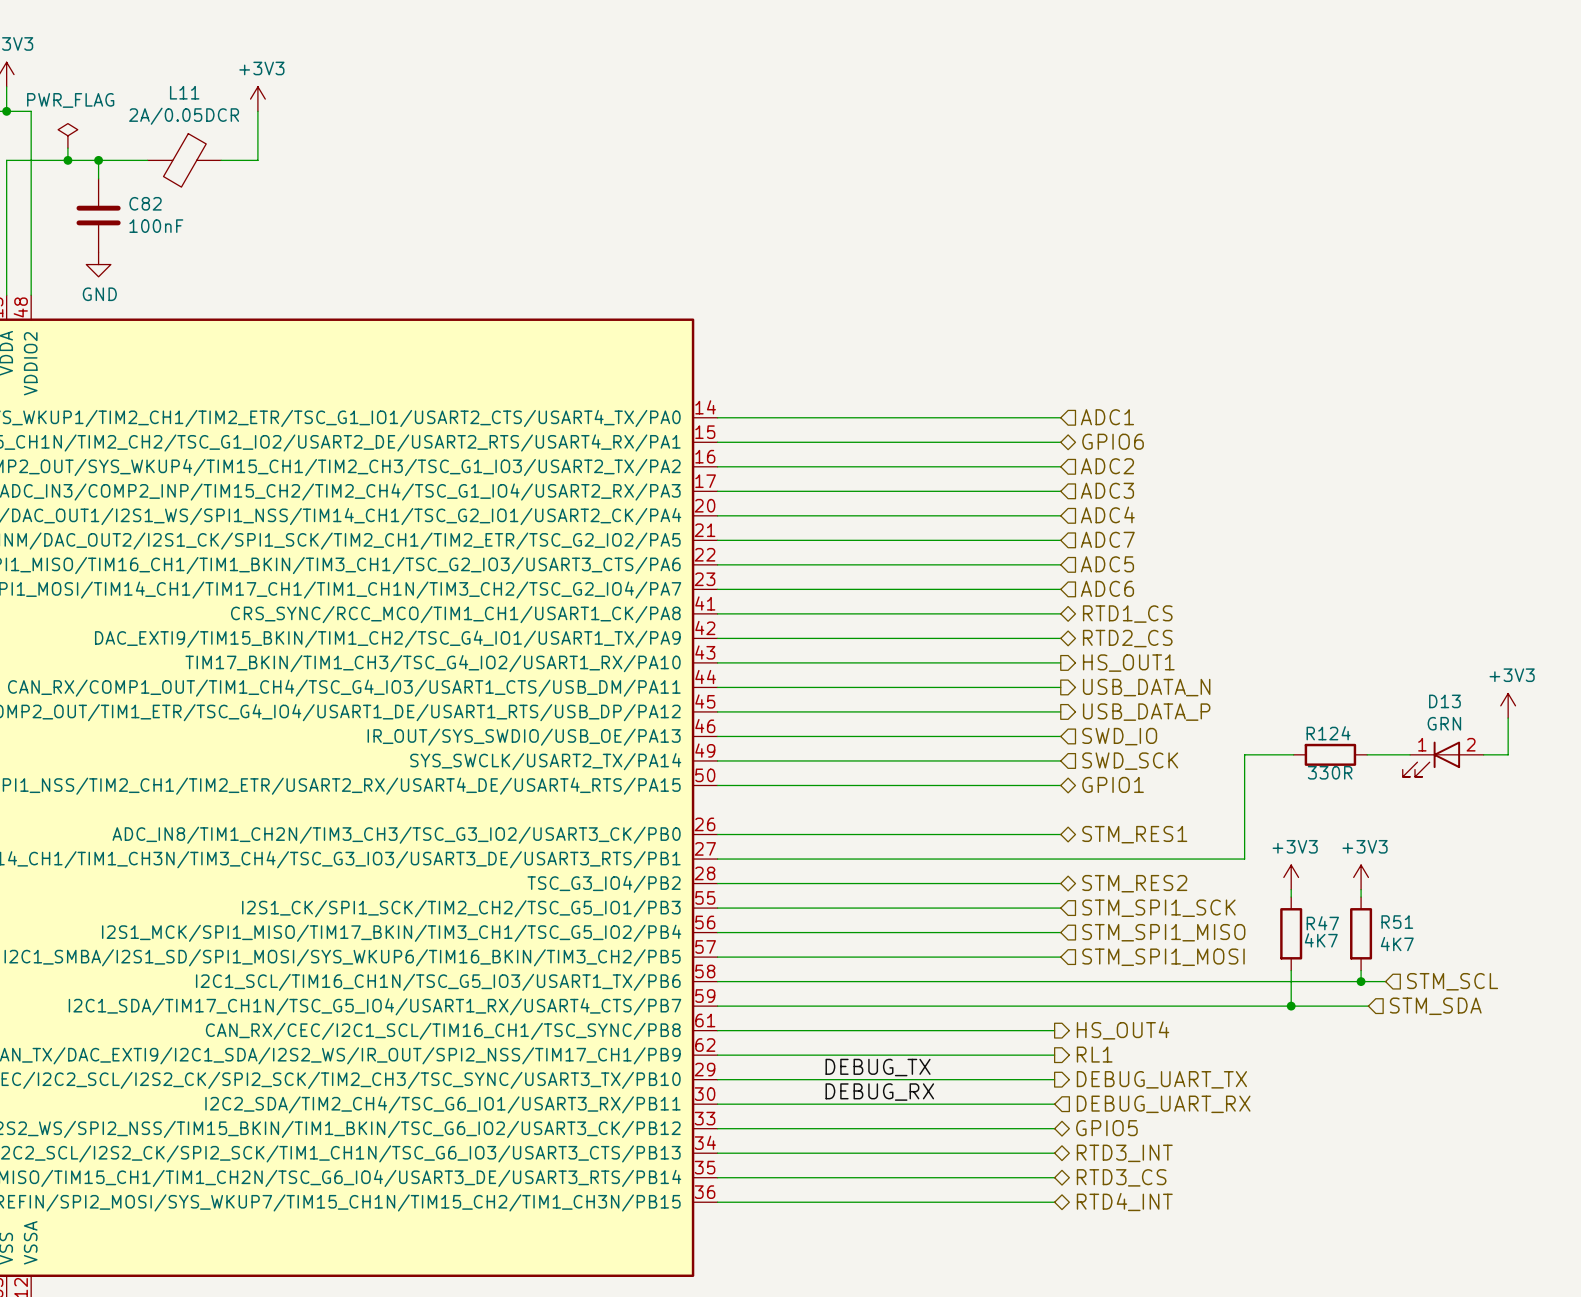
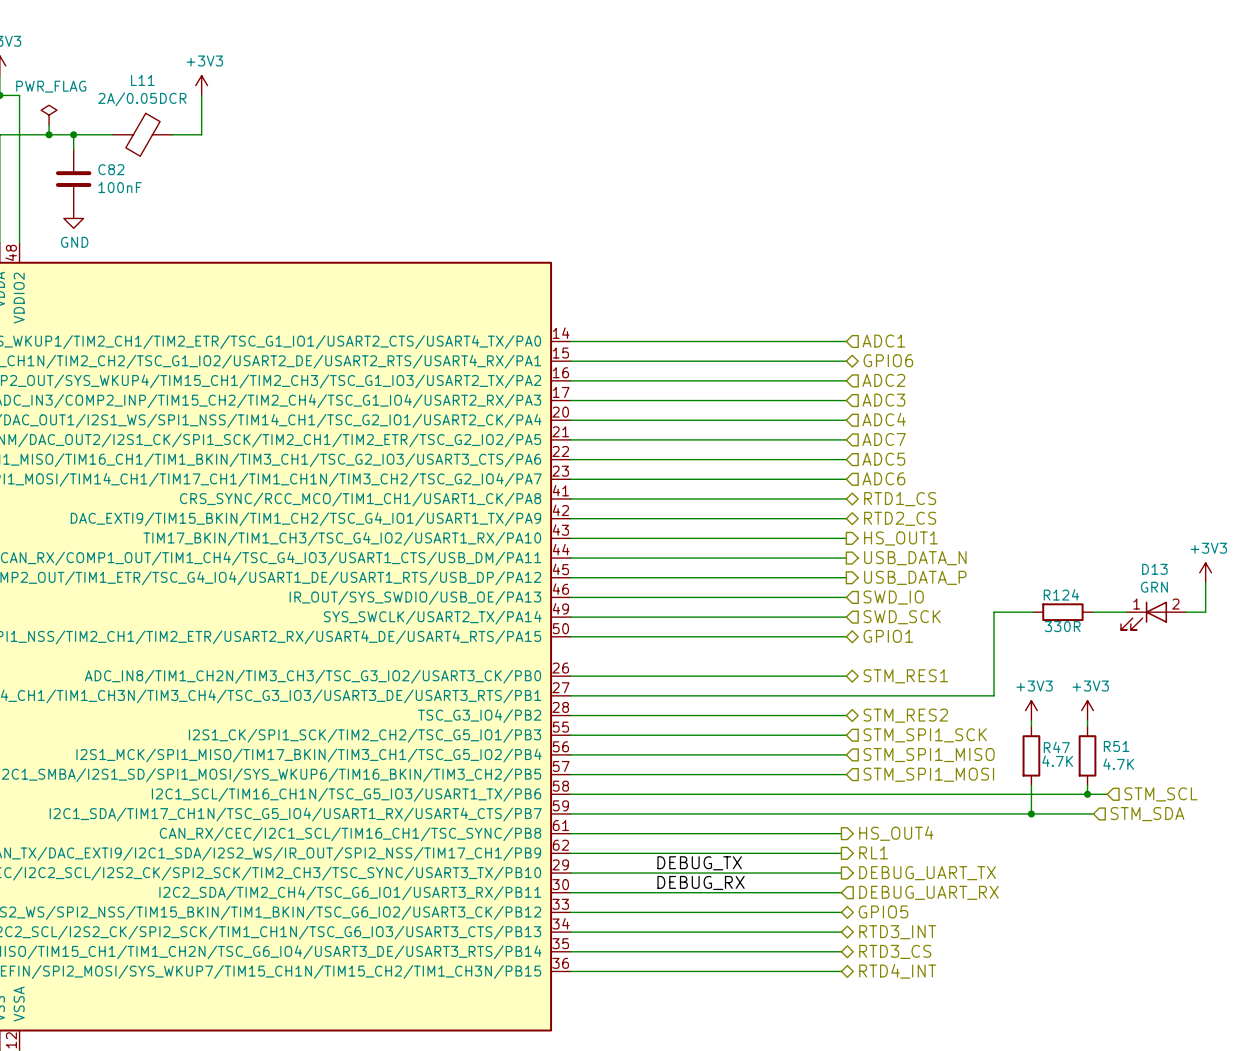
R47 value: 4K7 (1321, 940) -> 4.7K (1057, 761)
R51 value: 4K7 (1397, 944) -> 4.7K (1118, 764)

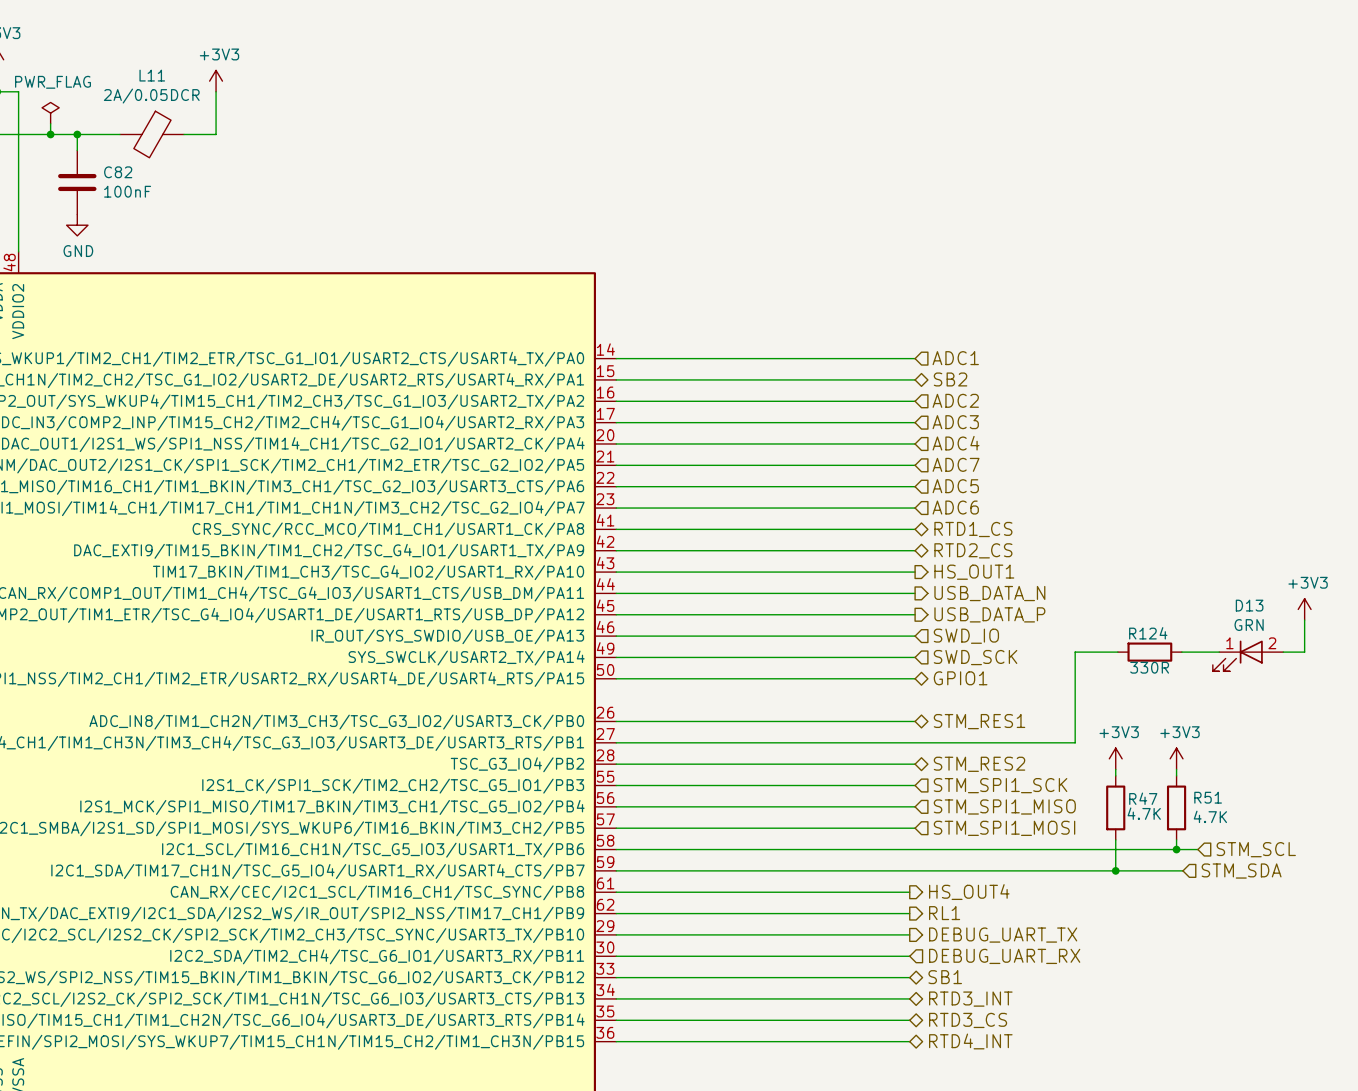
hierarchical label: GPIO6 (888, 360) -> SB2 (950, 379)
label: DEBUG_TX (699, 863) -> none
label: DEBUG_RX (701, 882) -> none
hierarchical label: GPIO5 (883, 911) -> SB1 (945, 977)

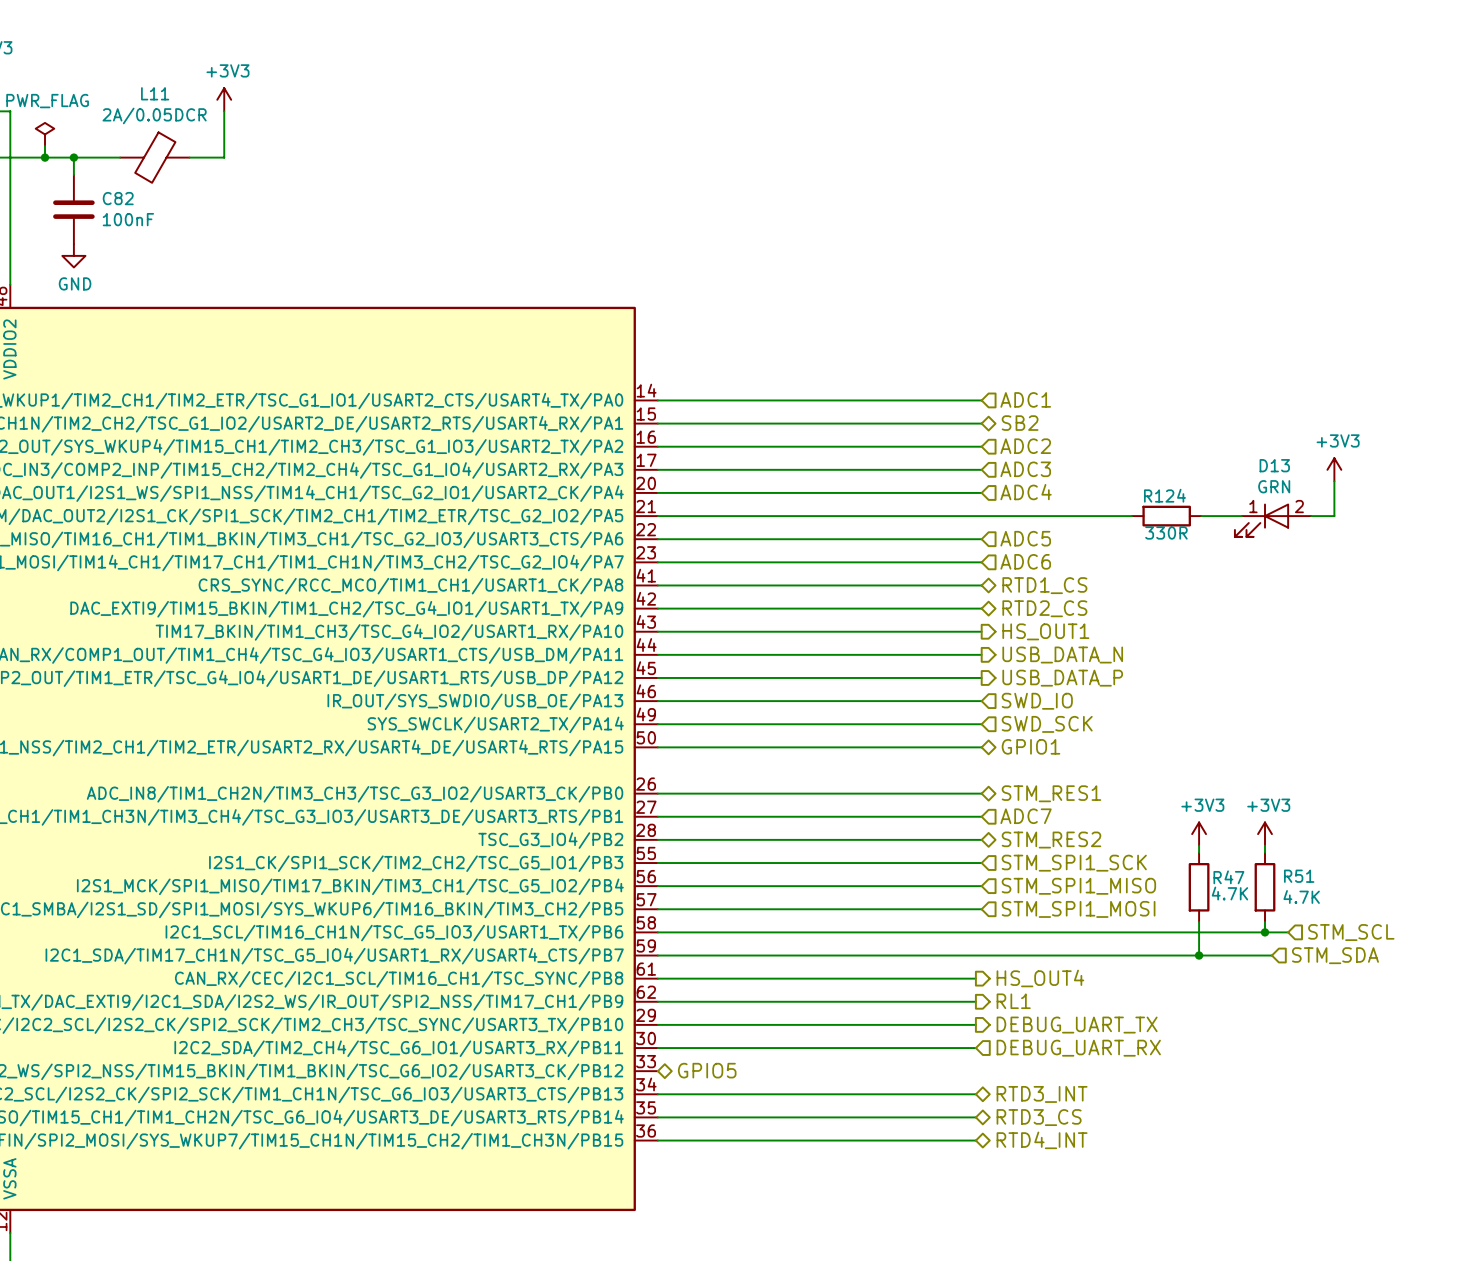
hierarchical label: ADC7 (956, 464) -> none
wire: none -> (981, 516) (1132, 516)
power symbol position: +3V3 (1304, 609) -> +3V3 (1334, 469)
wire: (1304, 620) (1304, 652) (1283, 652) -> (1334, 481) (1334, 516) (1311, 516)
wire: (1117, 652) (1075, 652) (1075, 742) (915, 742) -> none
R124 position: (1149, 652) -> (1166, 516)
wire: (1181, 652) (1219, 652) -> (1201, 516) (1241, 516)
D13 position: (1248, 655) -> (1273, 520)
hierarchical label: none -> ADC7 (1026, 816)
wire: (616, 977) (909, 977) -> none
hierarchical label: none -> GPIO5 (707, 1070)
hierarchical label: SB1 (945, 977) -> none

